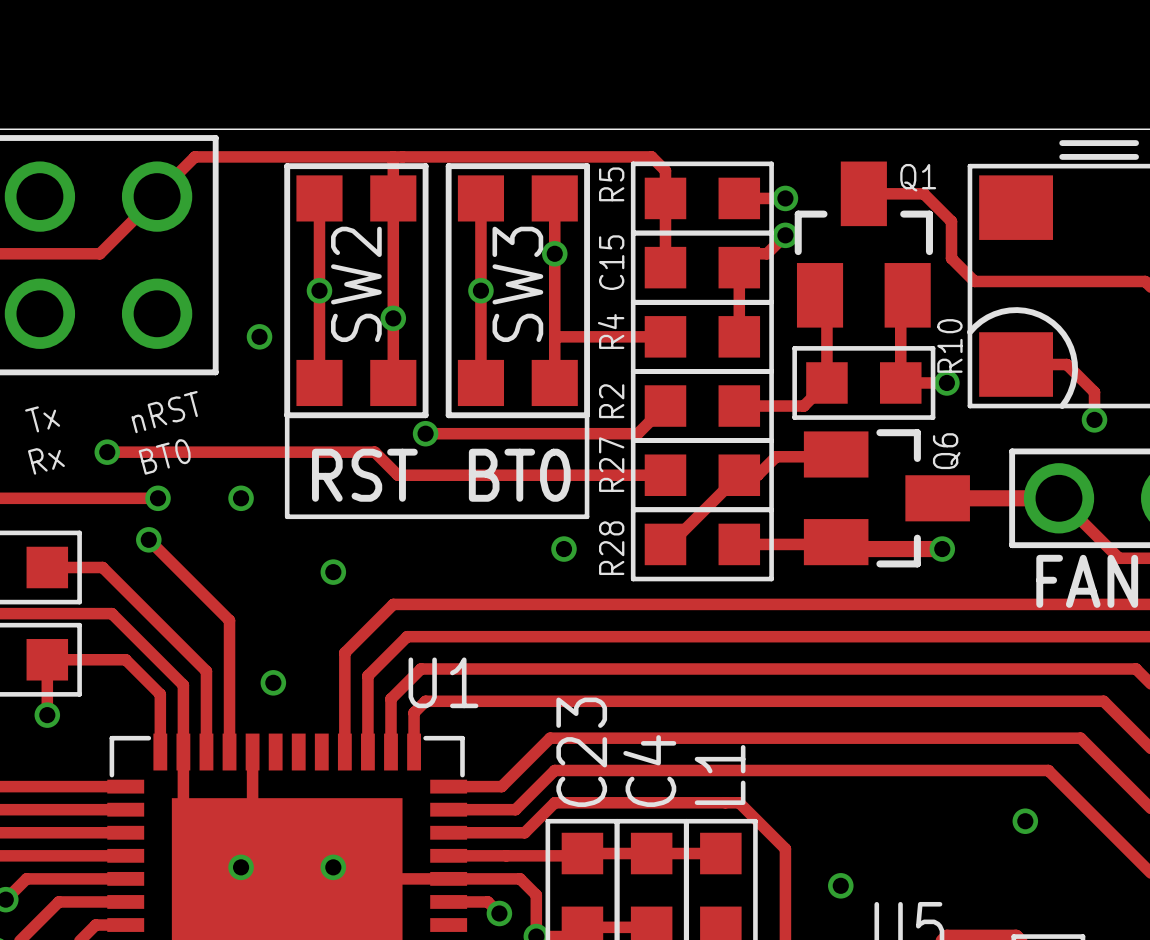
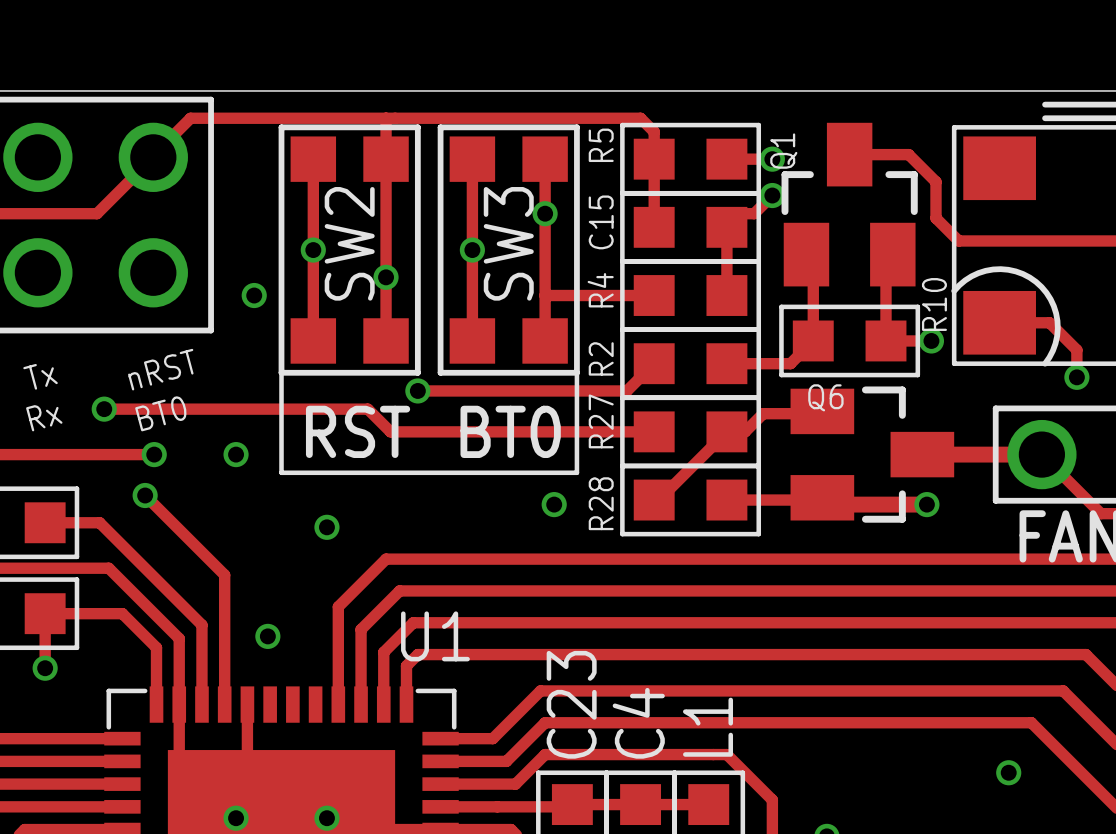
Q1 name rotation: 0° (918, 177) -> 90° counterclockwise (783, 151)
Q1 name position: Q1 (918, 177) -> Q1 (783, 151)
Q6 name rotation: 0° (946, 451) -> 90° clockwise (825, 397)
Q6 name position: Q6 (946, 451) -> Q6 (825, 397)

